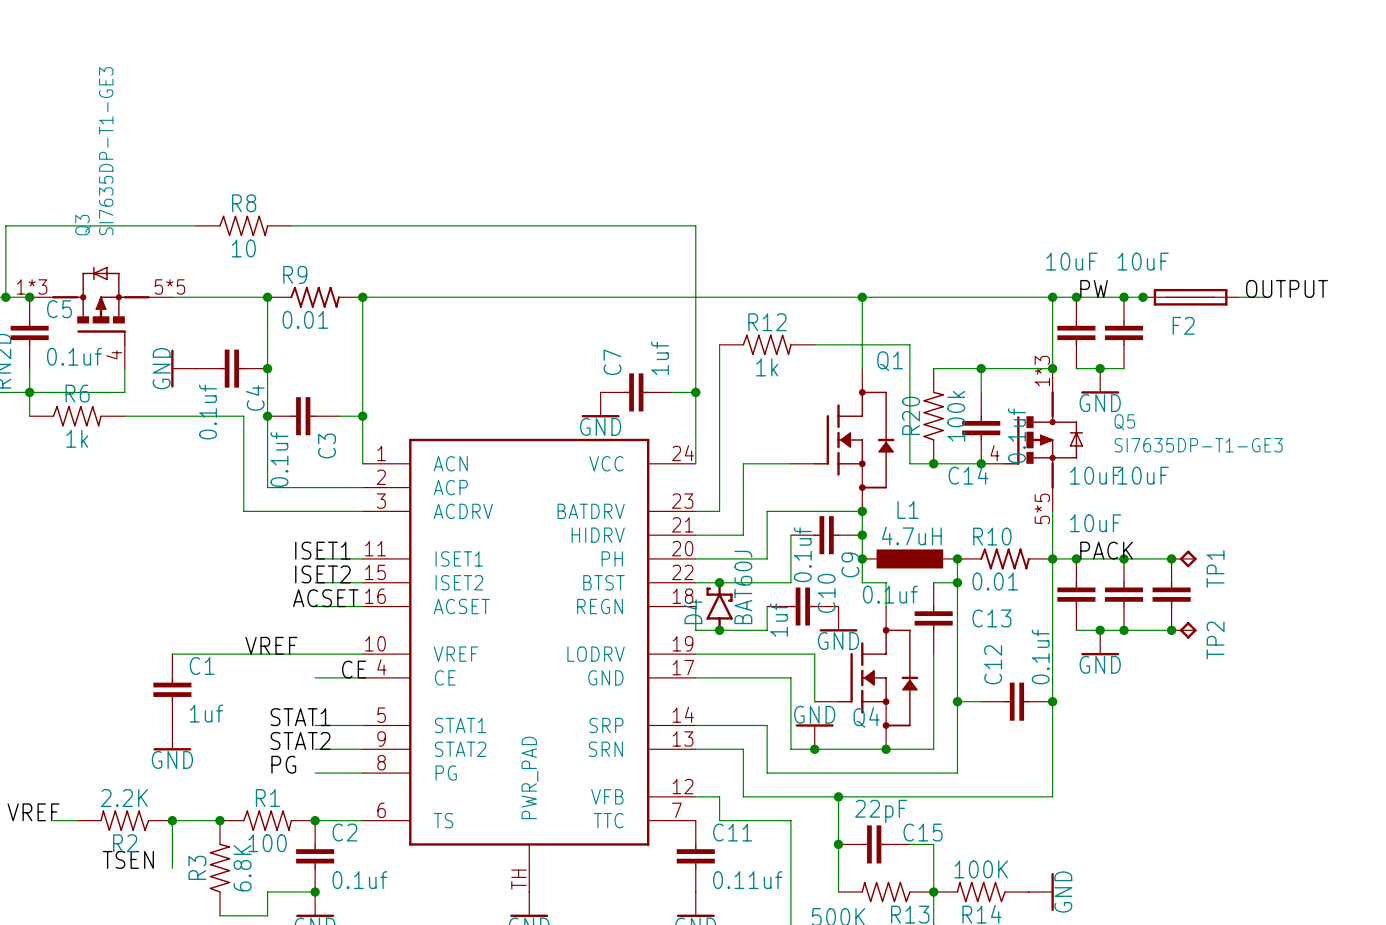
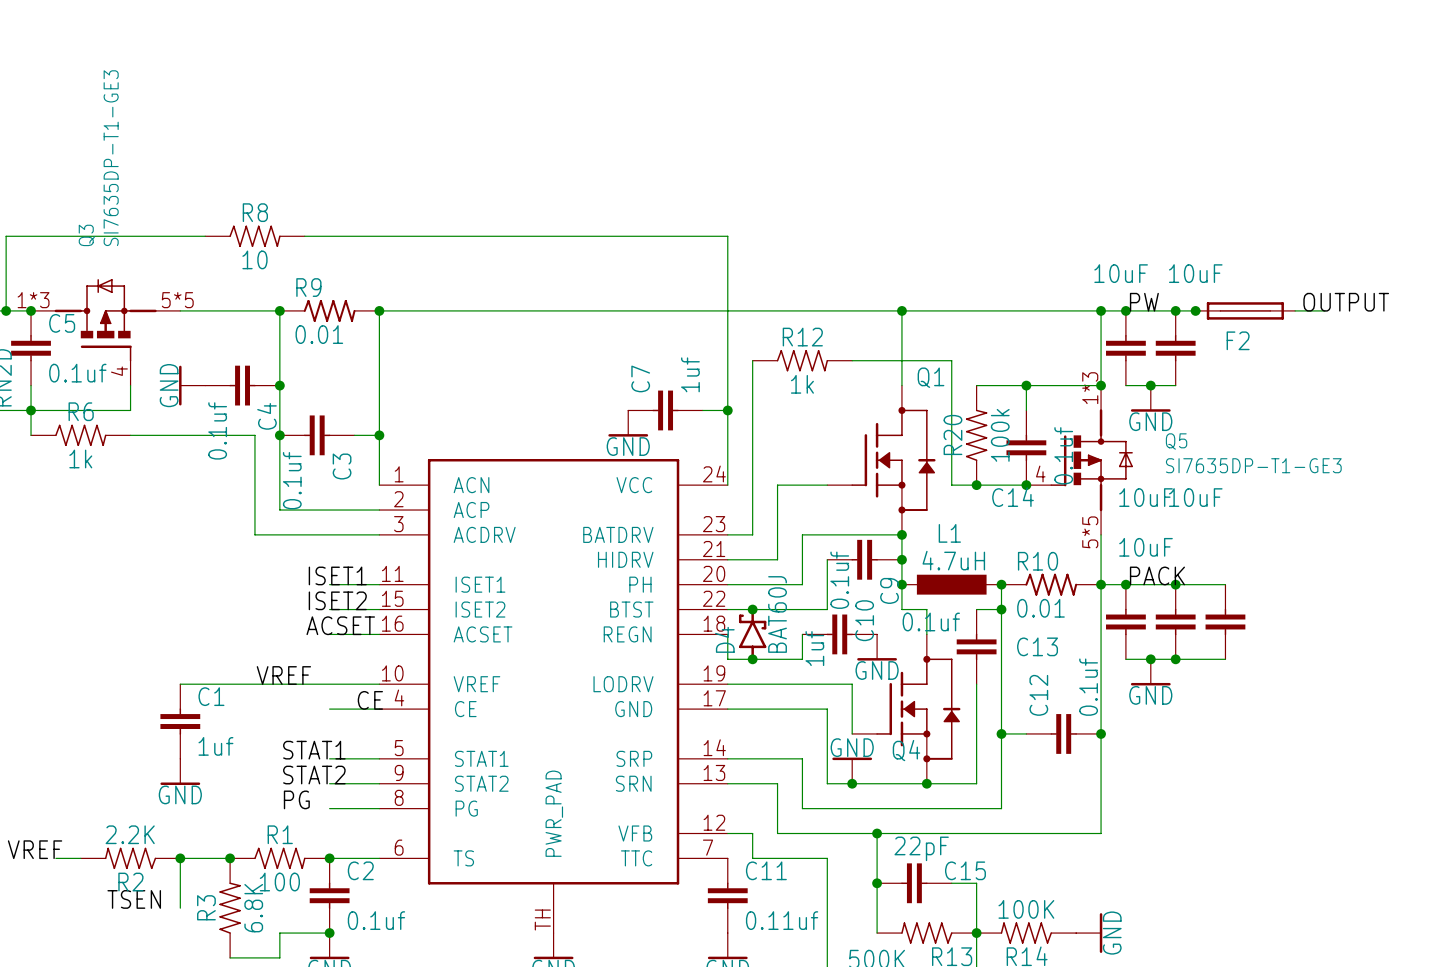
junction: (1171, 558) -> none
TP1: (1184, 558) -> none
junction: (1171, 630) -> none
TP2: (1184, 630) -> none

